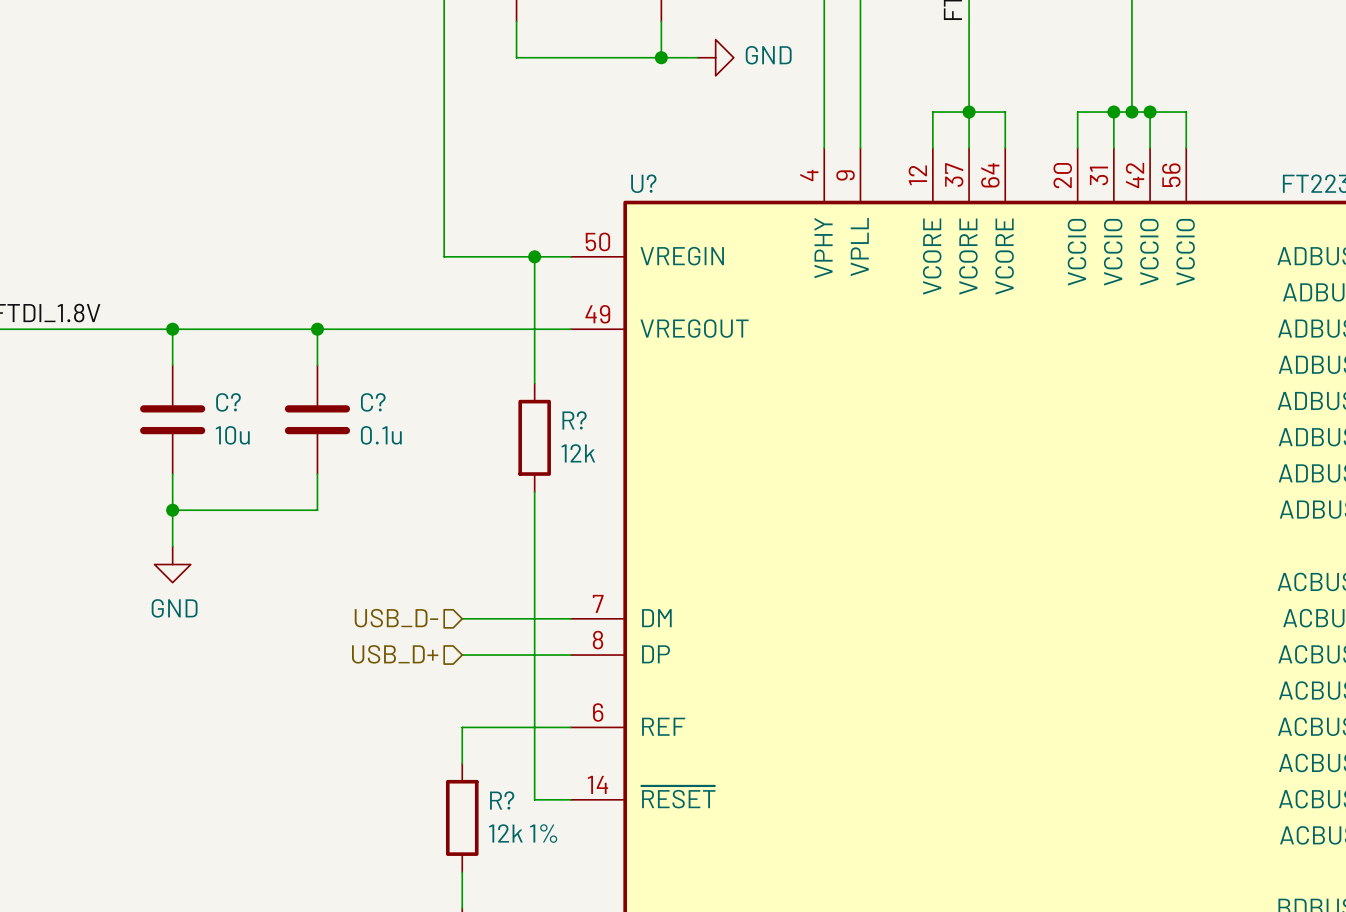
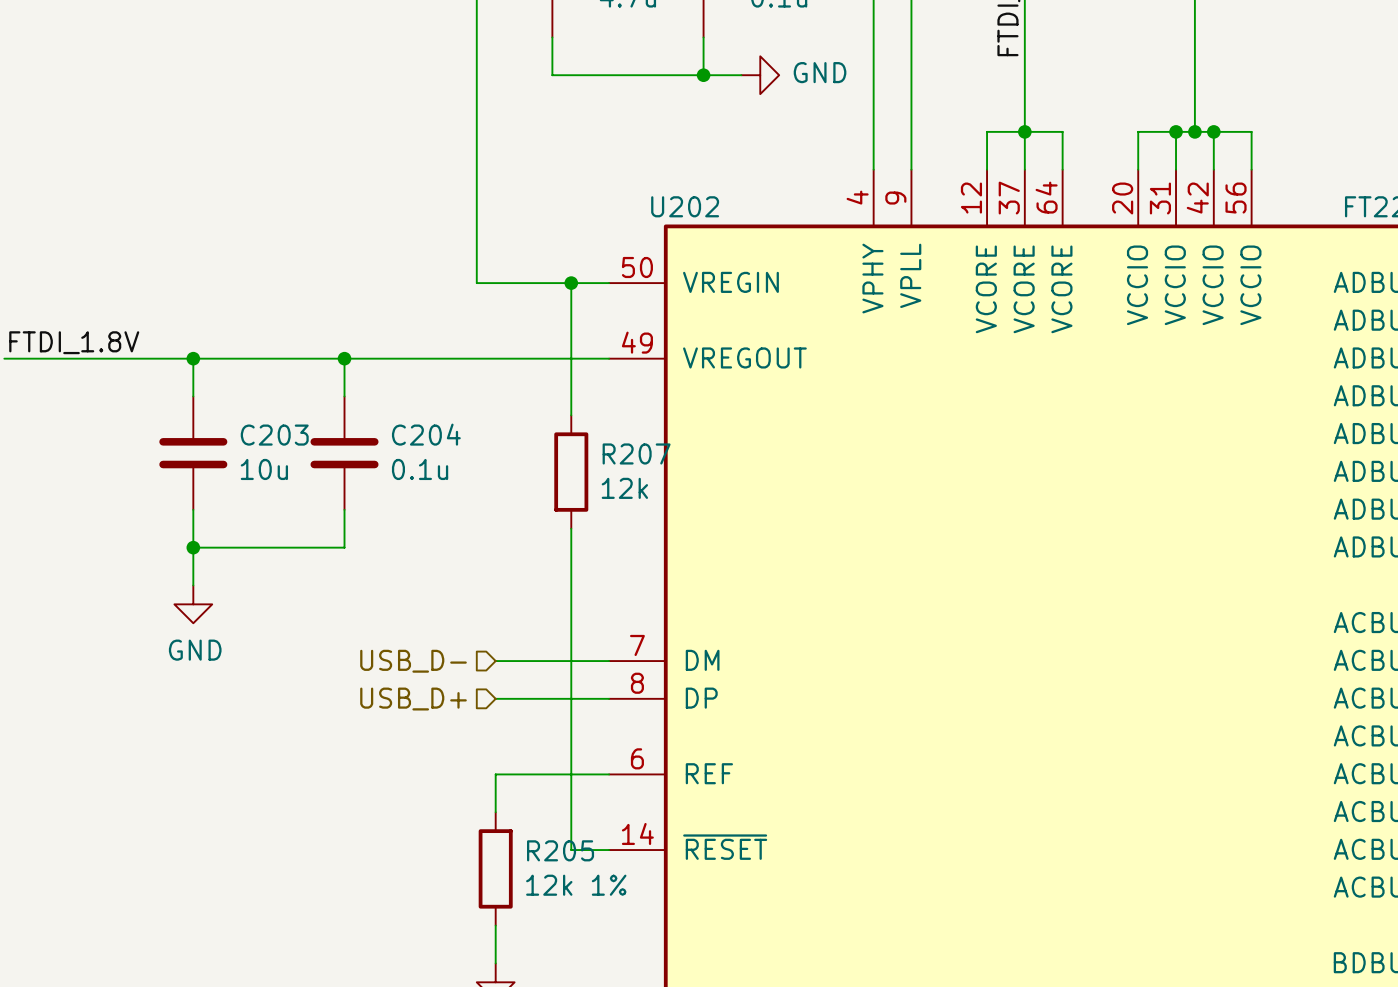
U? name: U? (643, 183) -> U202 (685, 206)
C? name: C? (228, 402) -> C203 (274, 435)
C? name: C? (373, 402) -> C204 (426, 434)
R? name: R? (574, 420) -> R207 (636, 453)
R? name: R? (502, 800) -> R205 (560, 850)

